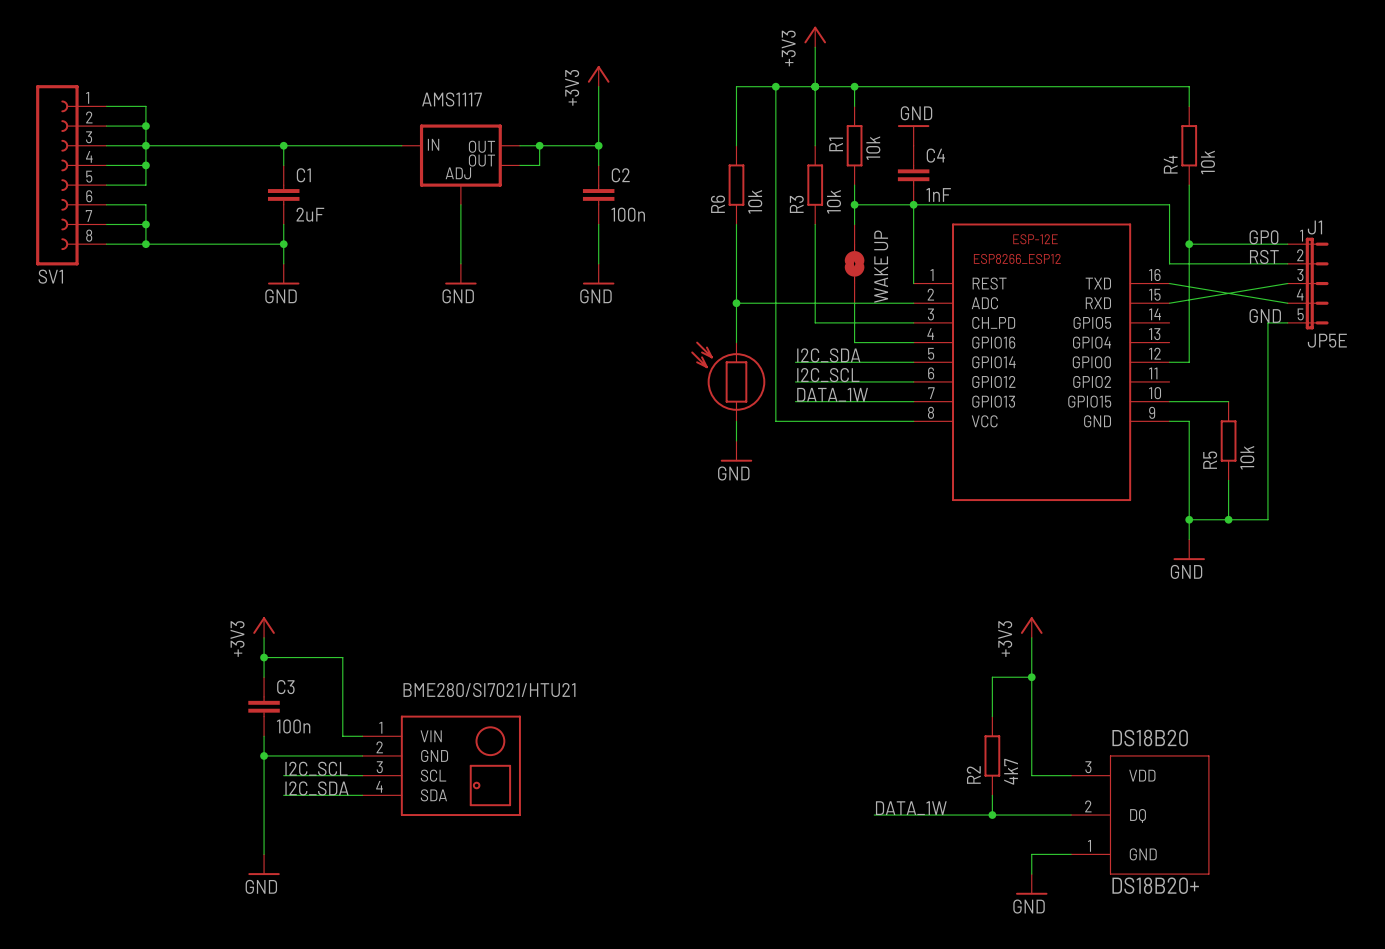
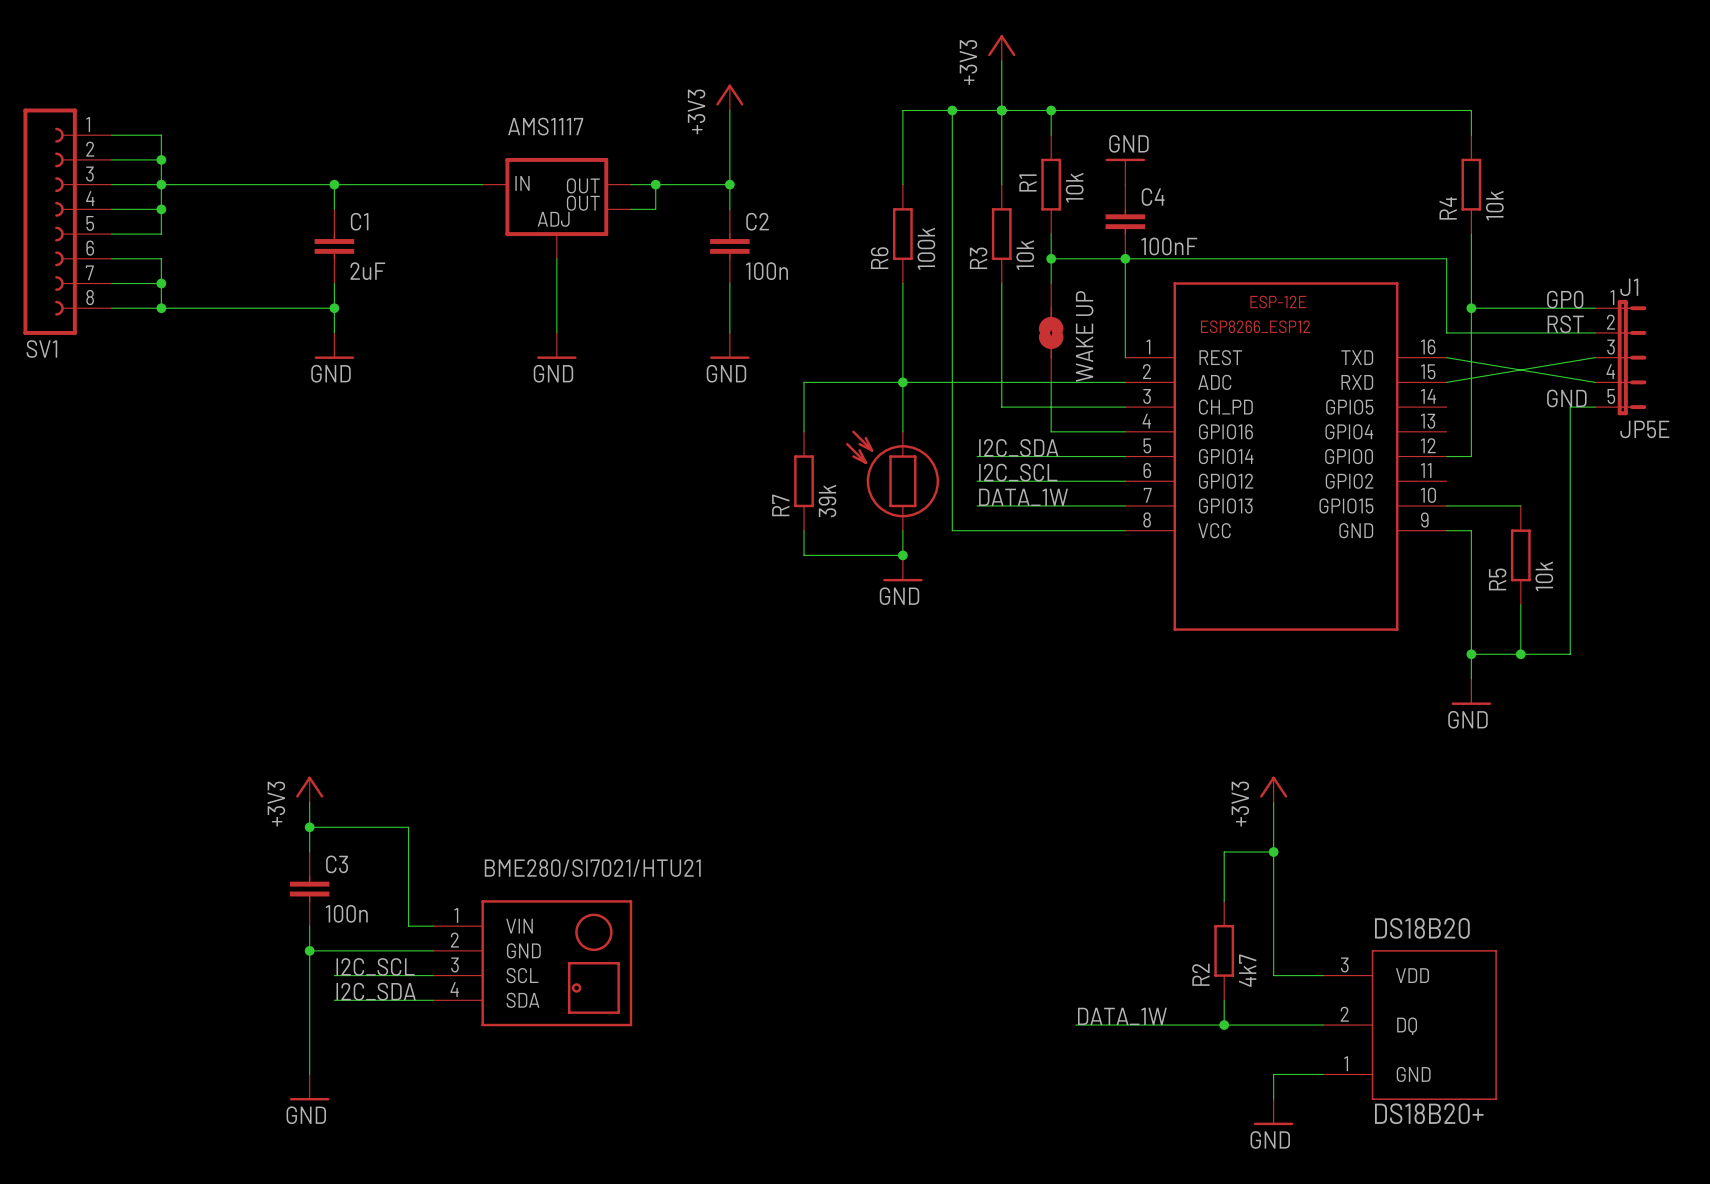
C4 value: 1nF (938, 194) -> 100nF (1169, 246)
R6 value: 10k (755, 201) -> 100k (926, 248)
wire: none -> (902, 382) (804, 382) (804, 431)
R7: none -> 39k (804, 481)
wire: none -> (804, 530) (804, 555) (902, 555)
junction: none -> (902, 555)

